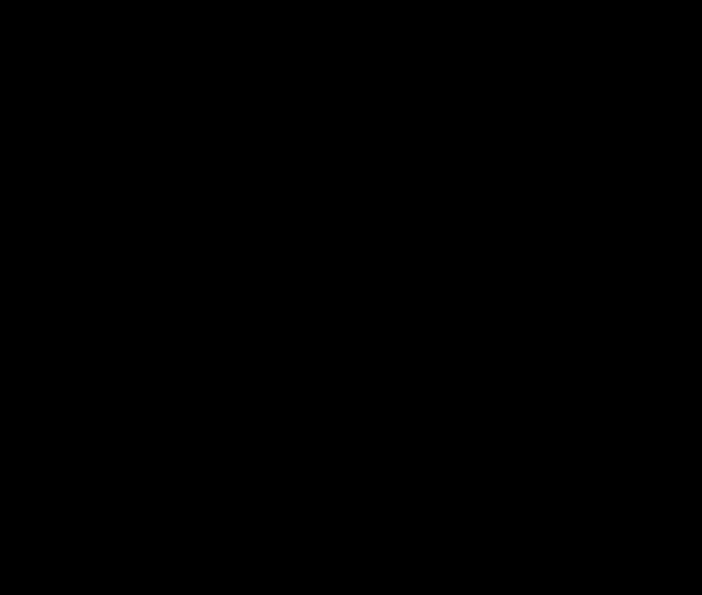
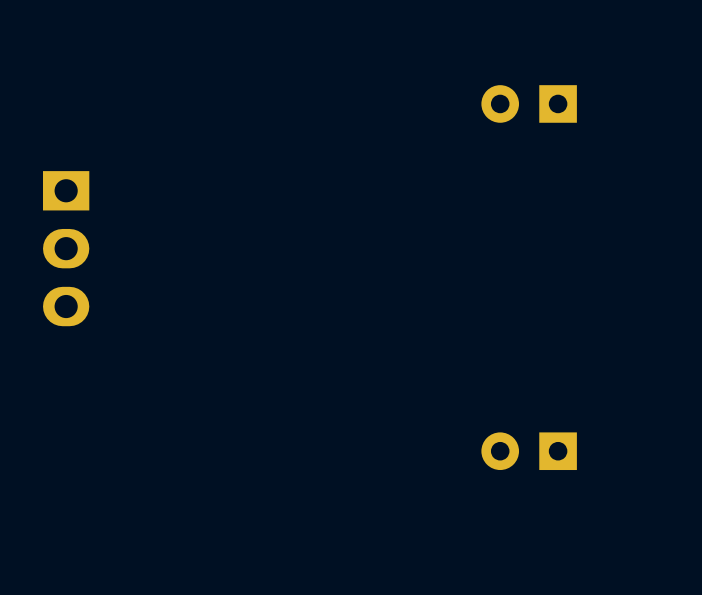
part: none -> (529, 103)
part: none -> (66, 248)
part: none -> (529, 451)

